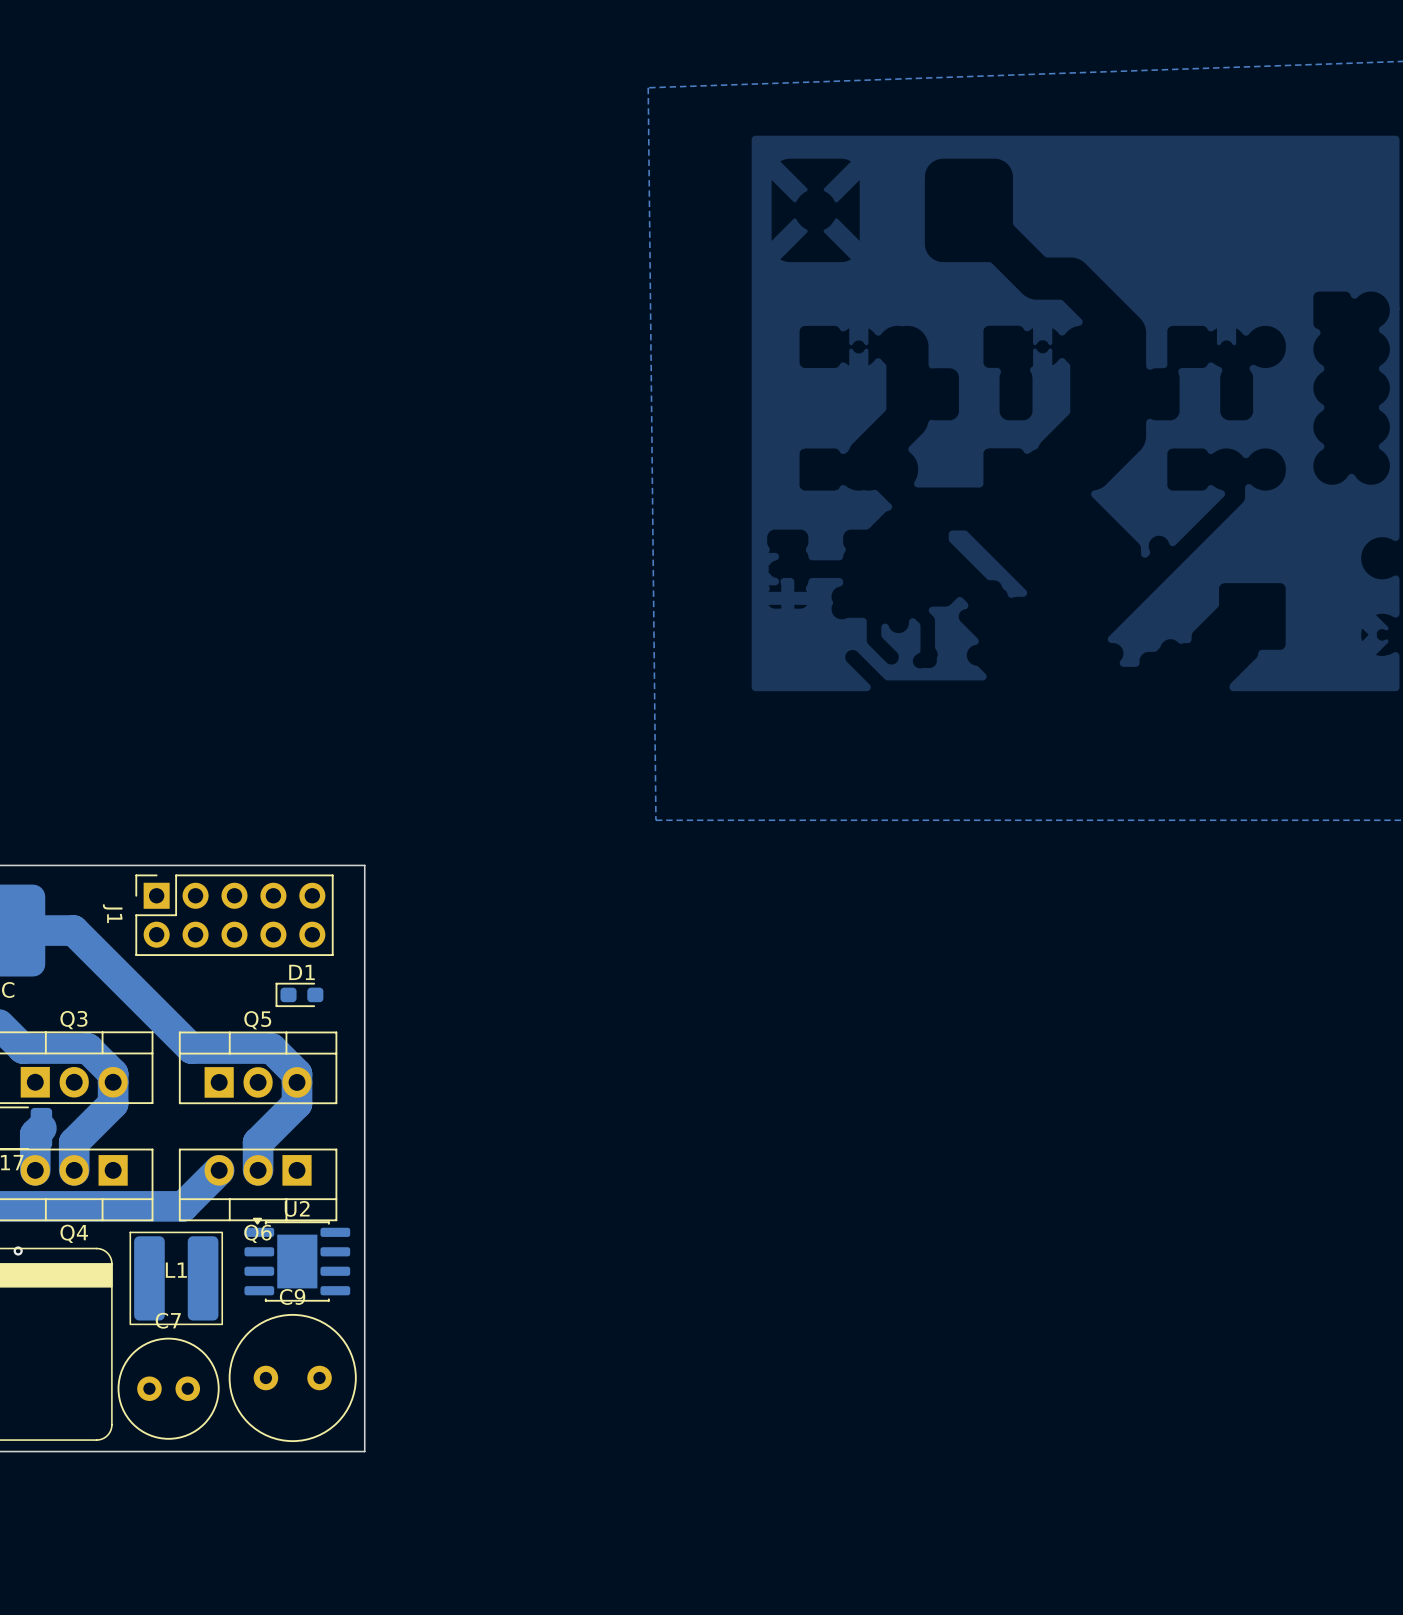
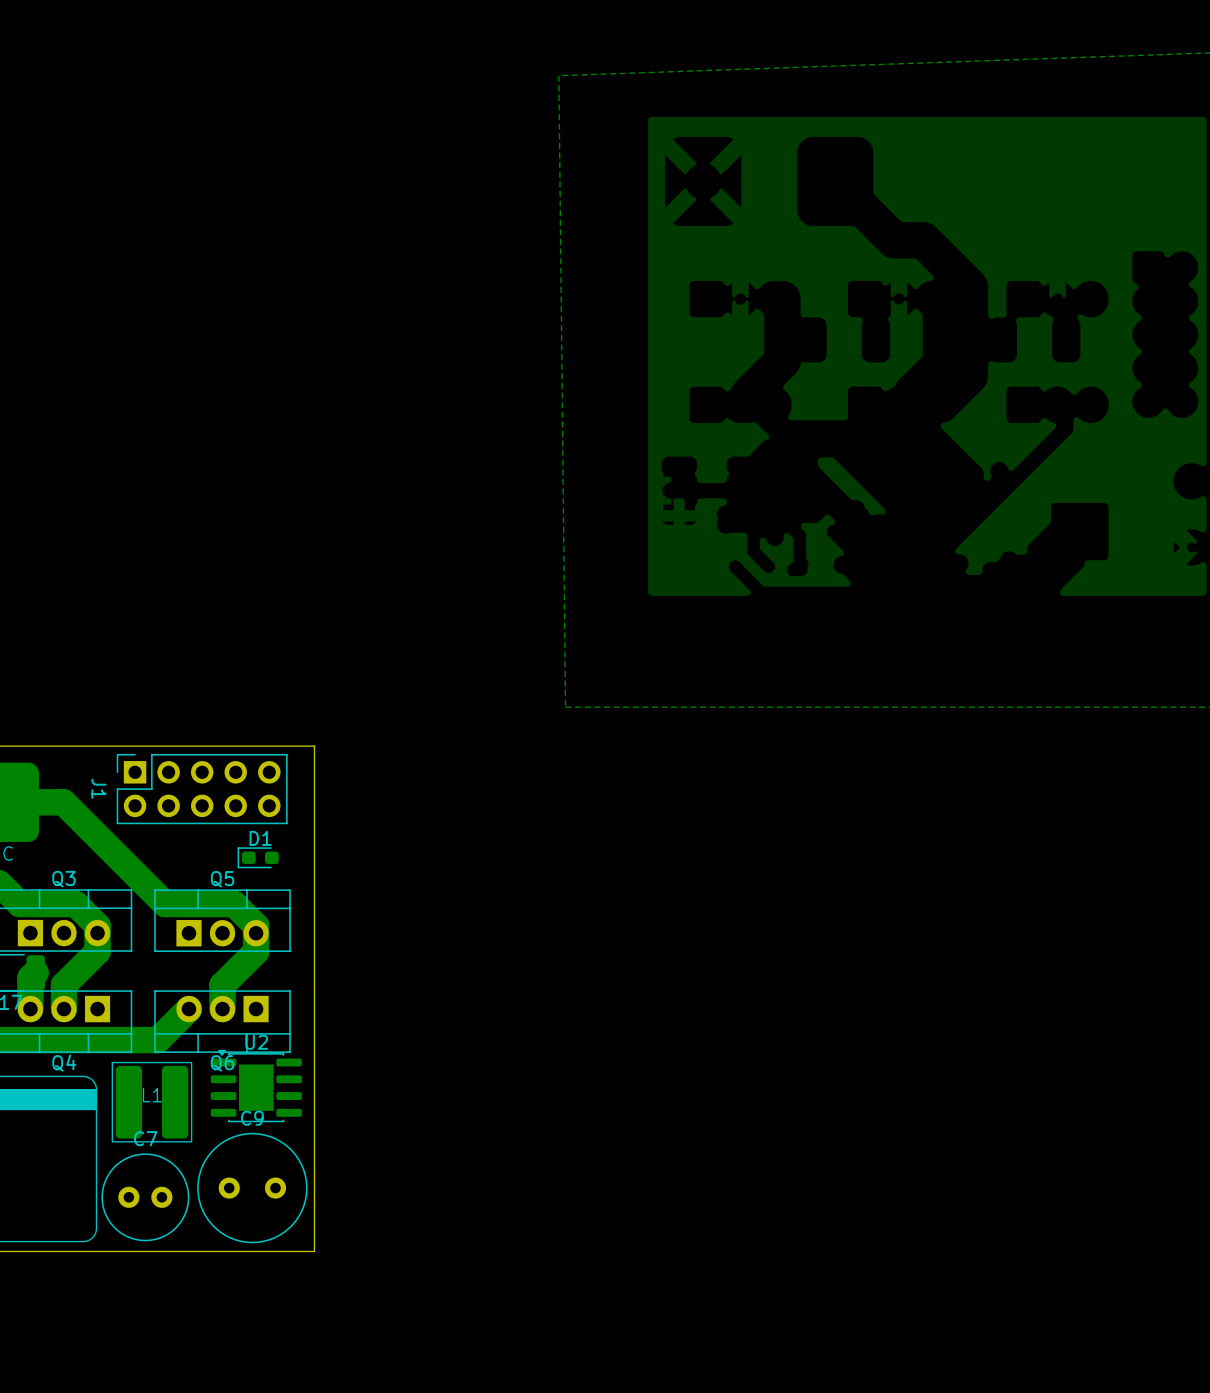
via: (18, 1250) -> none

